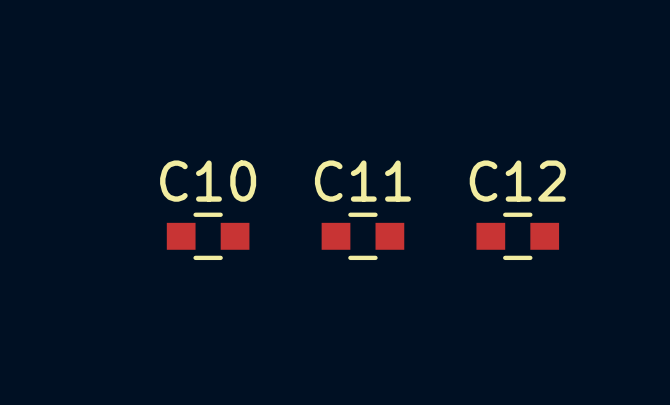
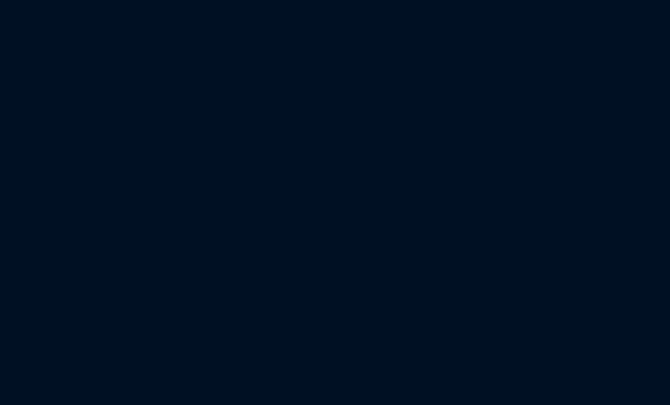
C10: (208, 236) -> none
C11: (362, 236) -> none
C12: (517, 236) -> none

